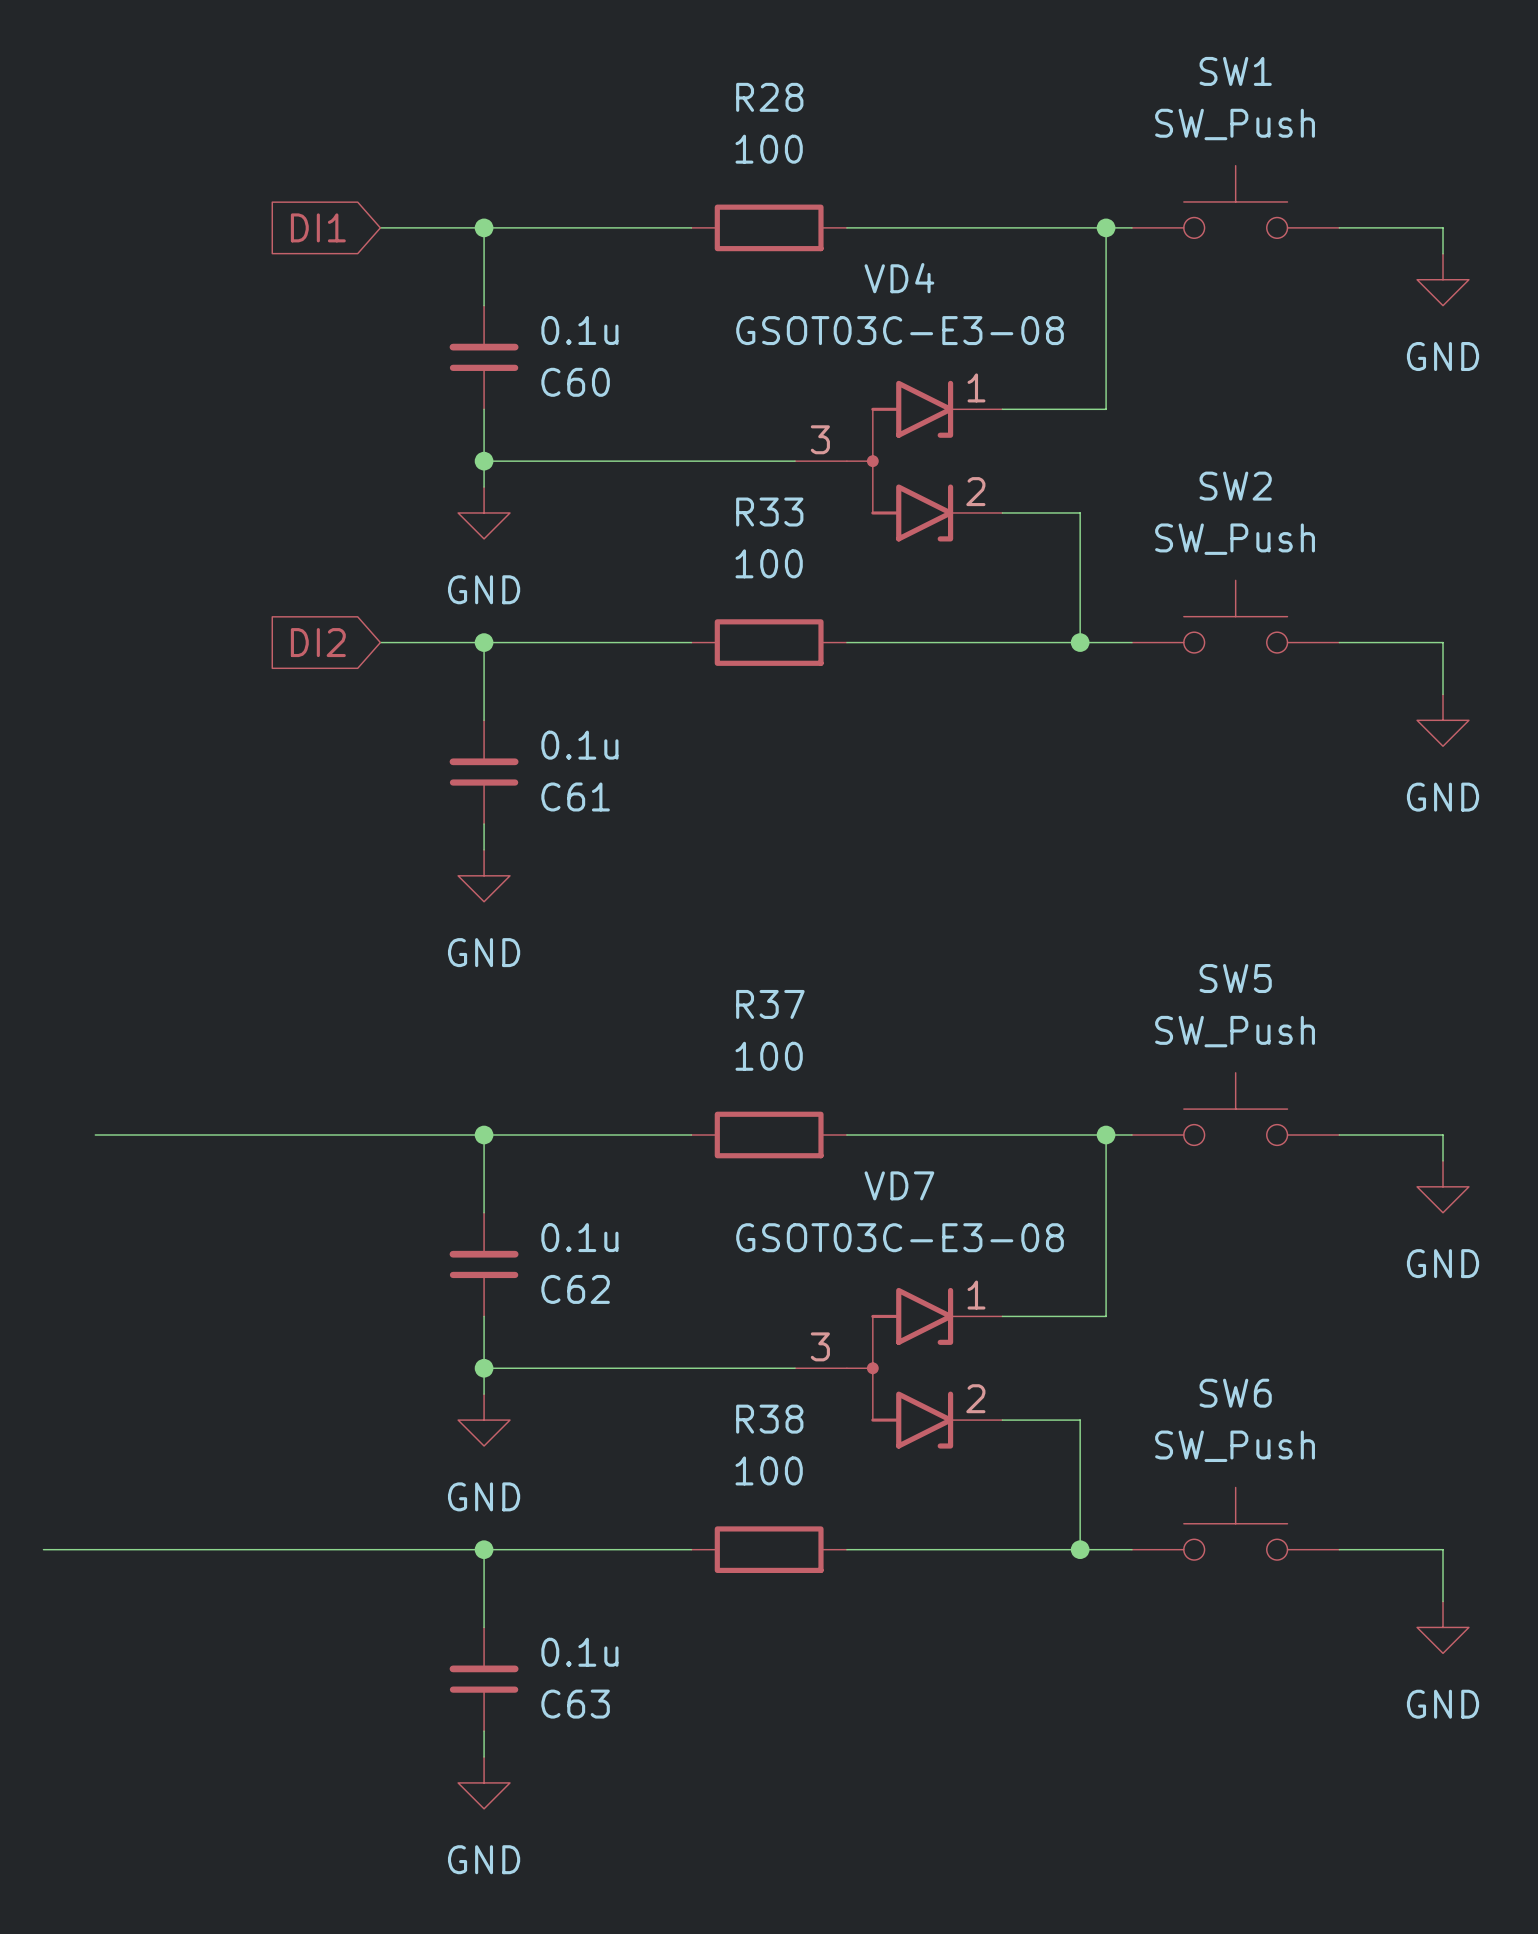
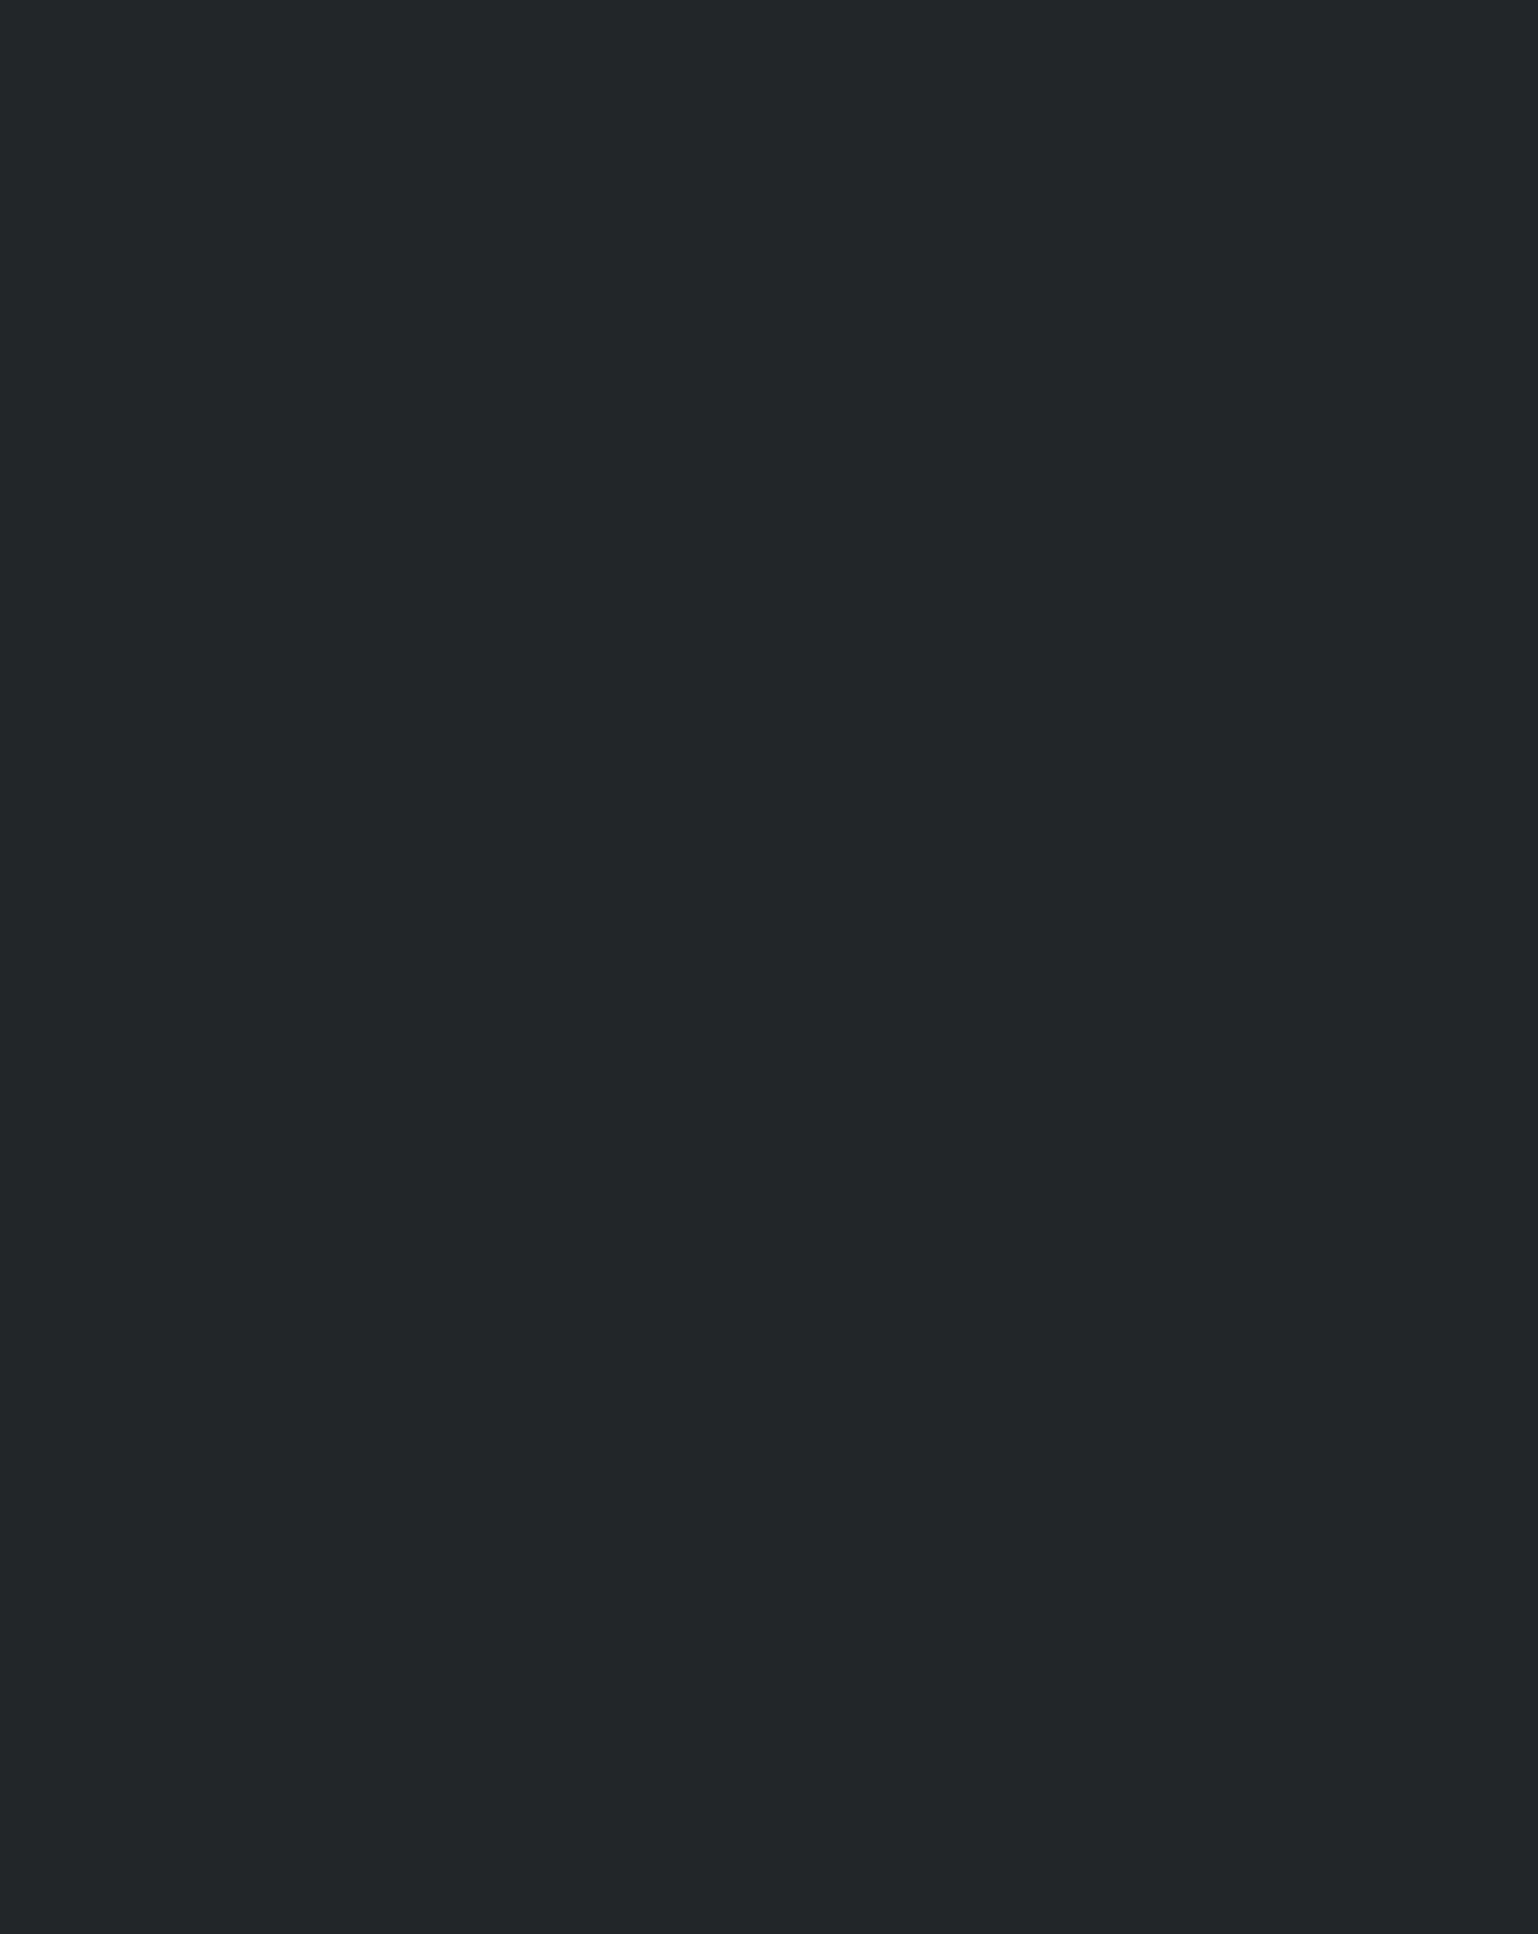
SW1: SW_Push (1235, 201) -> none
global label: DI1 (318, 227) -> none
wire: (380, 227) (691, 227) -> none
wire: (484, 227) (484, 305) -> none
junction: (484, 227) -> none
R28: 100 (769, 227) -> none
wire: (846, 227) (1131, 227) -> none
wire: (1106, 227) (1106, 409) (1002, 409) -> none
junction: (1106, 227) -> none
wire: (1339, 227) (1443, 227) (1443, 253) -> none
power symbol: GND (1443, 279) -> none
C60: 0.1u (484, 357) -> none
wire: (484, 409) (484, 487) -> none
wire: (484, 461) (795, 461) -> none
junction: (484, 461) -> none
VD4: GSOT03C-E3-08 (898, 461) -> none
power symbol: GND (484, 512) -> none
wire: (1002, 512) (1080, 512) (1080, 642) -> none
SW2: SW_Push (1235, 616) -> none
global label: DI2 (318, 642) -> none
wire: (380, 642) (691, 642) -> none
wire: (484, 642) (484, 720) -> none
junction: (484, 642) -> none
R33: 100 (769, 642) -> none
wire: (846, 642) (1131, 642) -> none
junction: (1080, 642) -> none
wire: (1339, 642) (1443, 642) (1443, 694) -> none
power symbol: GND (1443, 720) -> none
C61: 0.1u (484, 772) -> none
wire: (484, 823) (484, 849) -> none
power symbol: GND (484, 875) -> none
SW5: SW_Push (1235, 1109) -> none
wire: (95, 1135) (691, 1135) -> none
wire: (484, 1135) (484, 1212) -> none
junction: (484, 1135) -> none
R37: 100 (769, 1135) -> none
wire: (846, 1135) (1131, 1135) -> none
wire: (1106, 1135) (1106, 1316) (1002, 1316) -> none
junction: (1106, 1135) -> none
wire: (1339, 1135) (1443, 1135) (1443, 1160) -> none
power symbol: GND (1443, 1186) -> none
C62: 0.1u (484, 1264) -> none
wire: (484, 1316) (484, 1394) -> none
wire: (484, 1368) (795, 1368) -> none
junction: (484, 1368) -> none
VD7: GSOT03C-E3-08 (898, 1368) -> none
power symbol: GND (484, 1420) -> none
wire: (1002, 1420) (1080, 1420) (1080, 1549) -> none
SW6: SW_Push (1235, 1523) -> none
wire: (43, 1549) (691, 1549) -> none
wire: (484, 1549) (484, 1627) -> none
junction: (484, 1549) -> none
R38: 100 (769, 1549) -> none
wire: (846, 1549) (1131, 1549) -> none
junction: (1080, 1549) -> none
wire: (1339, 1549) (1443, 1549) (1443, 1601) -> none
power symbol: GND (1443, 1627) -> none
C63: 0.1u (484, 1679) -> none
wire: (484, 1731) (484, 1757) -> none
power symbol: GND (484, 1782) -> none

